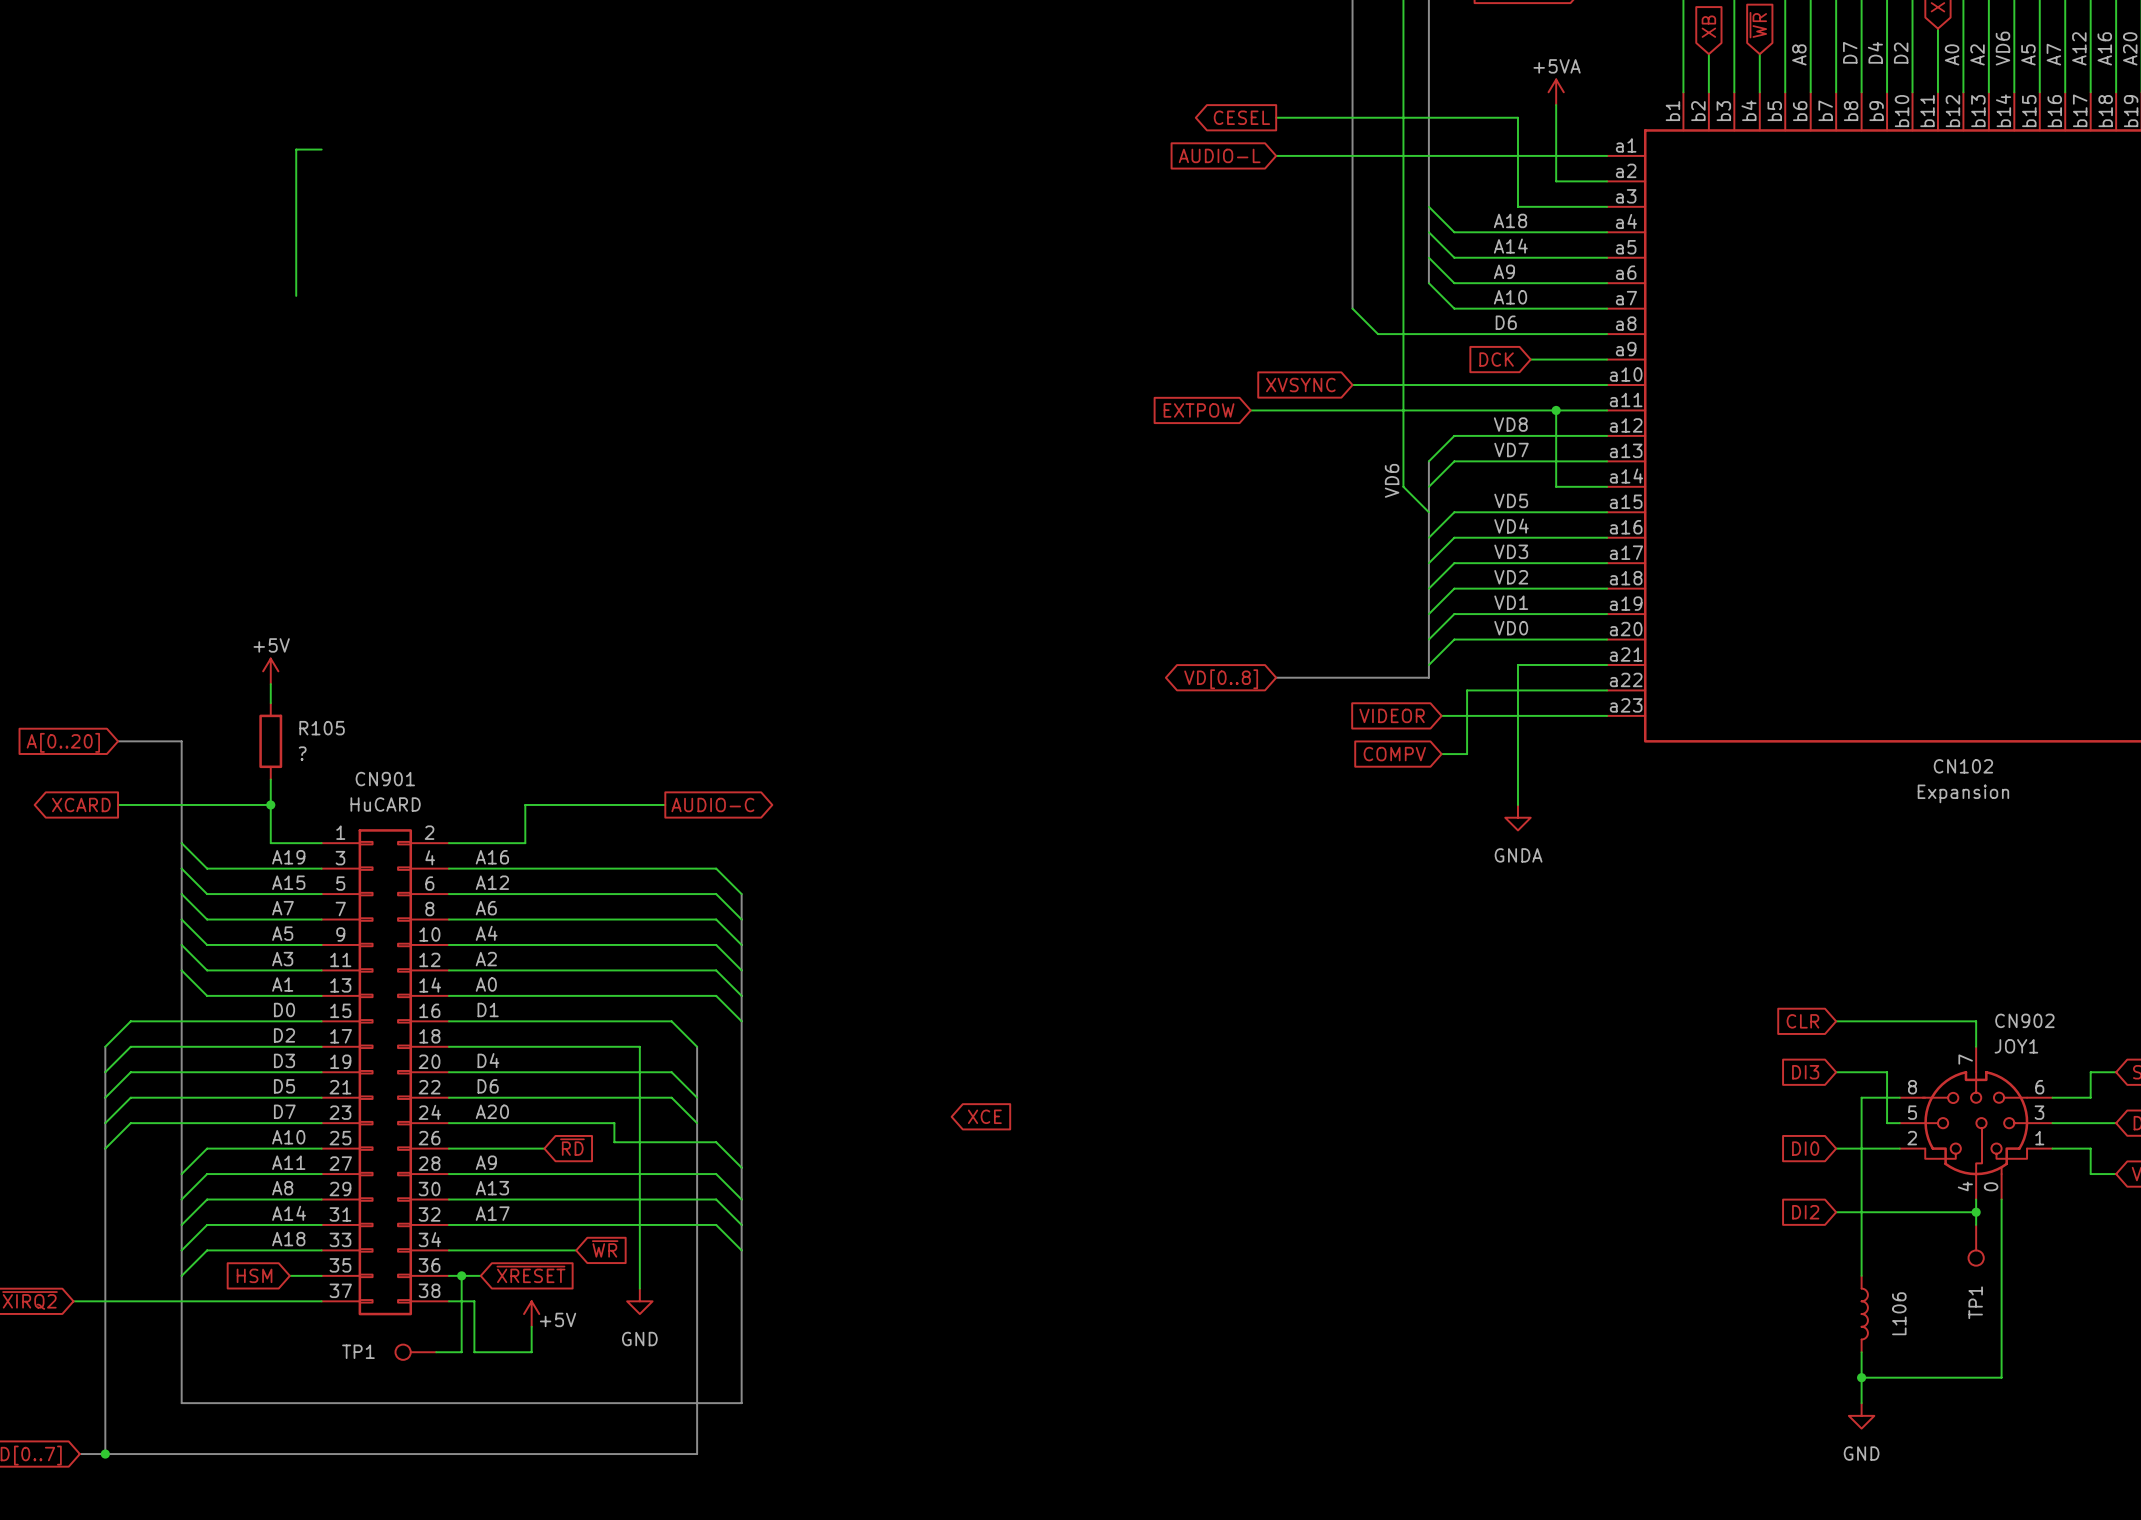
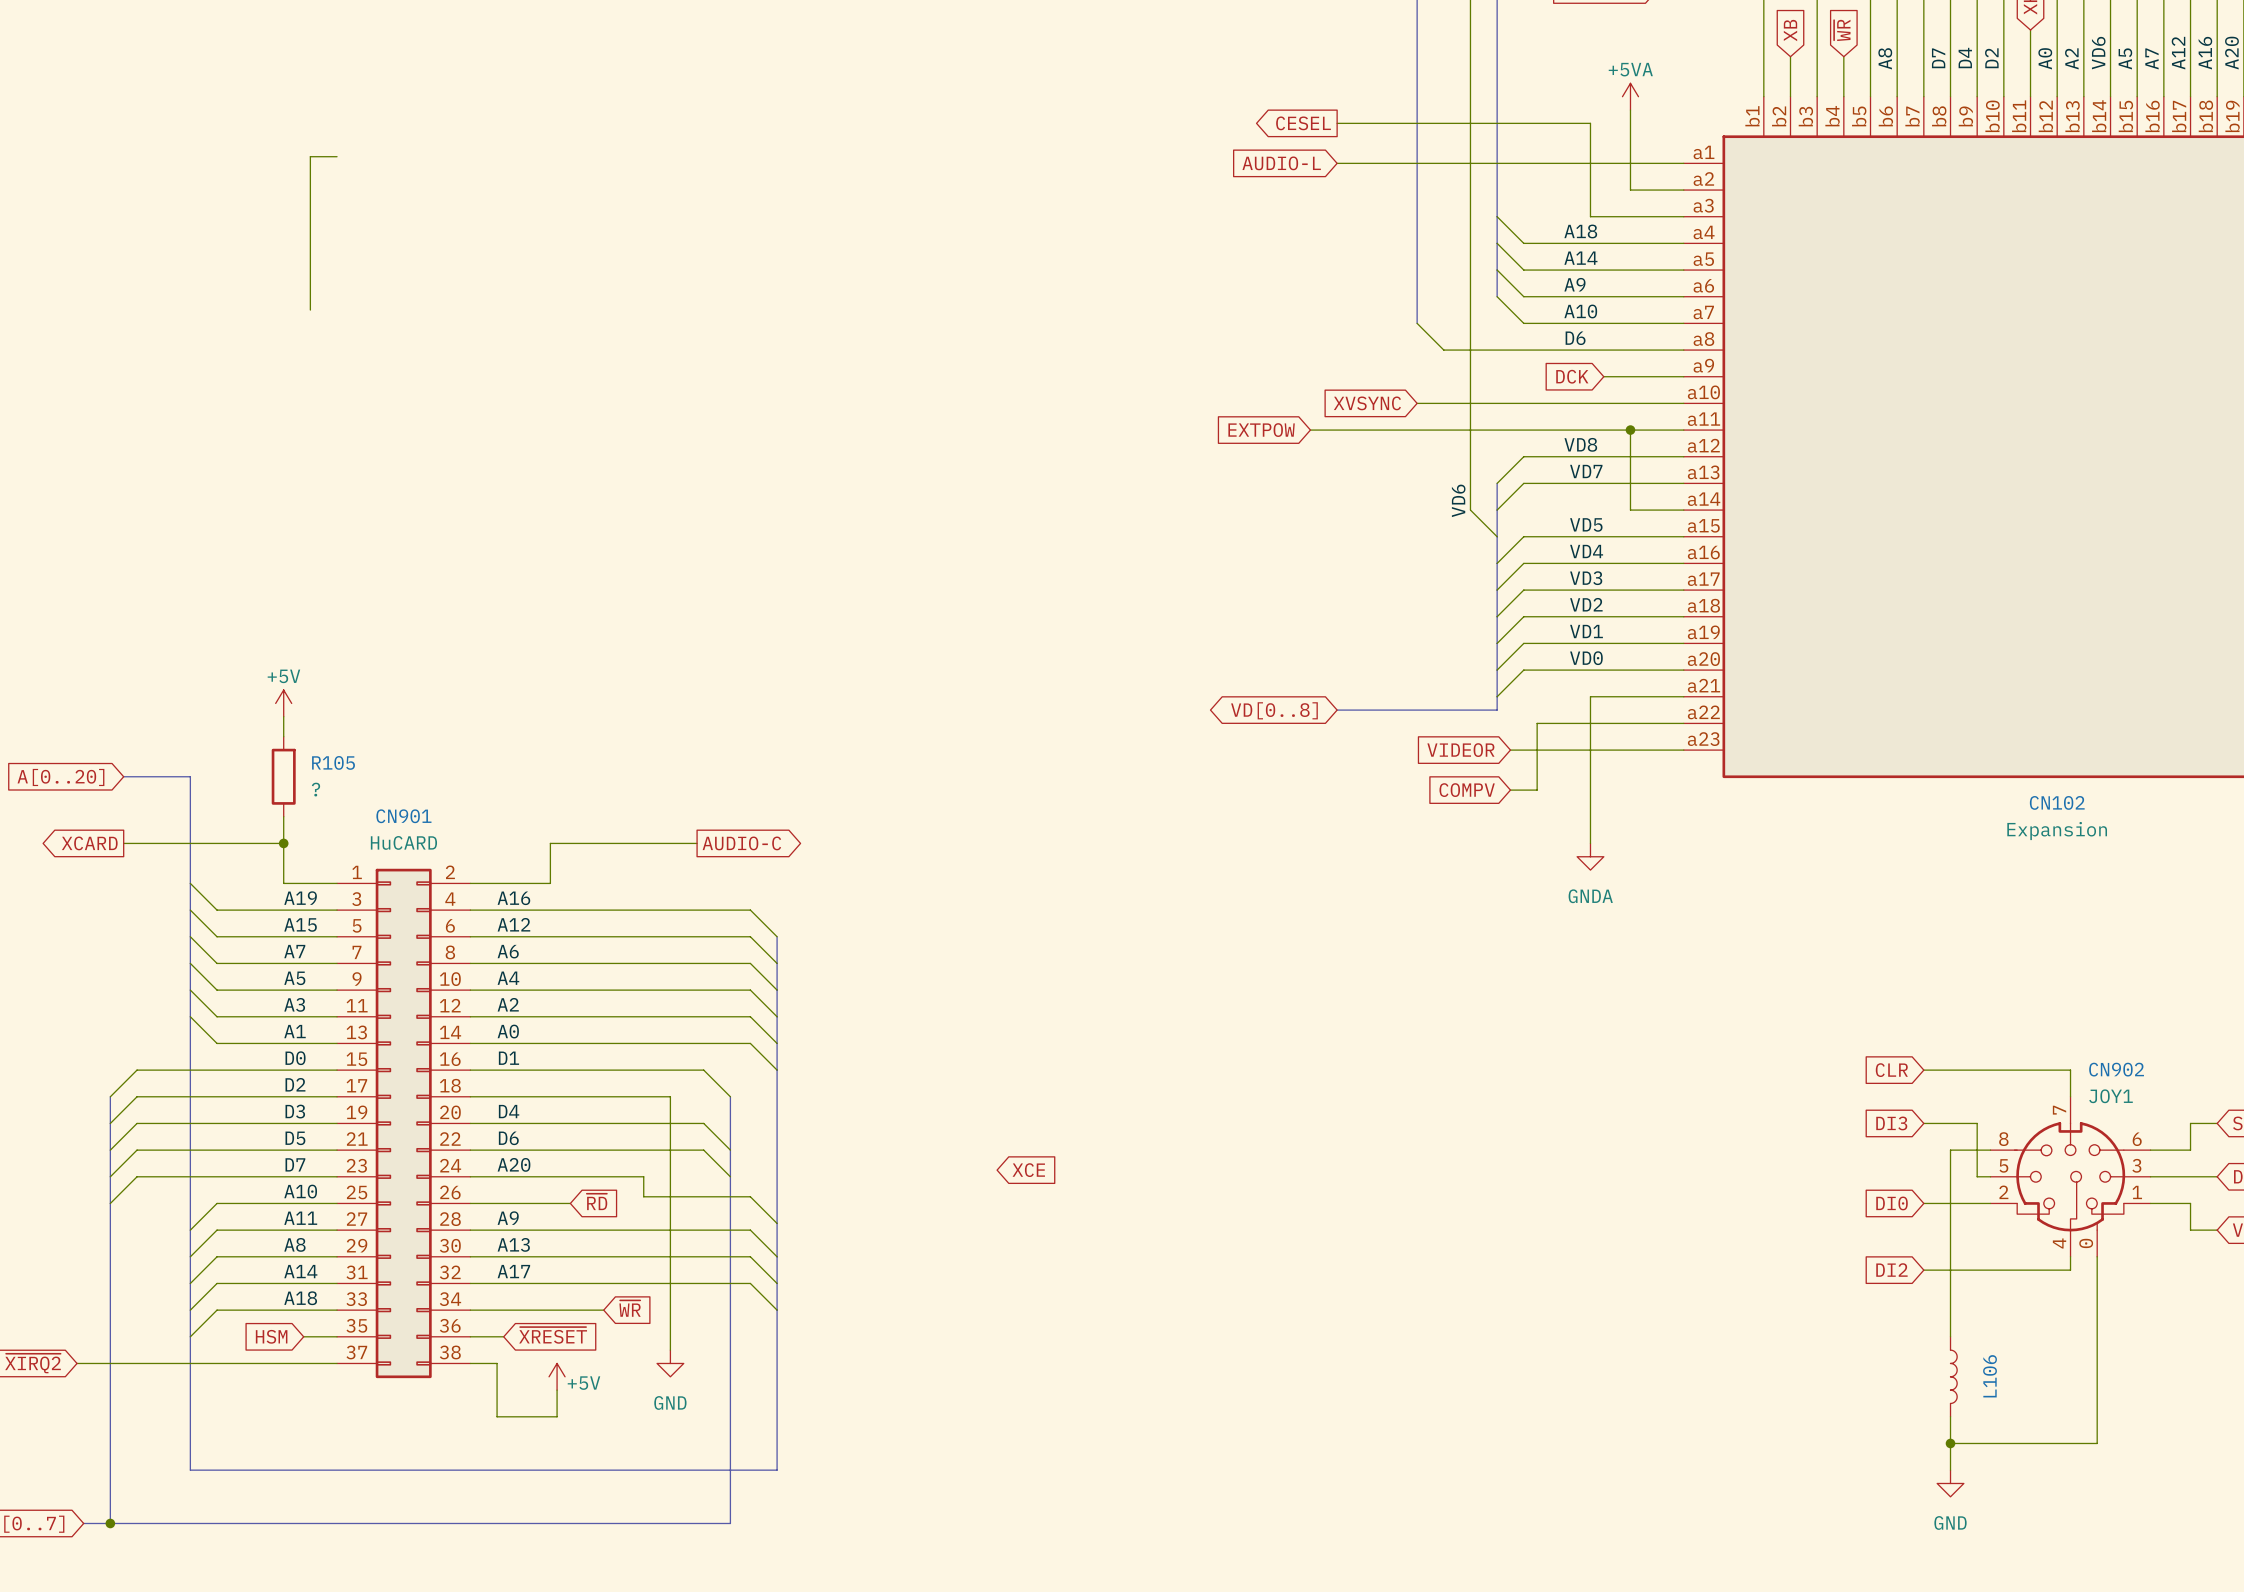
wire: (1976, 1212) (1976, 1224) -> none
junction: (1976, 1212) -> none
TP1: (1976, 1245) -> none
wire: (461, 1275) (461, 1352) (436, 1352) -> none
junction: (461, 1275) -> none
TP1: (415, 1352) -> none

